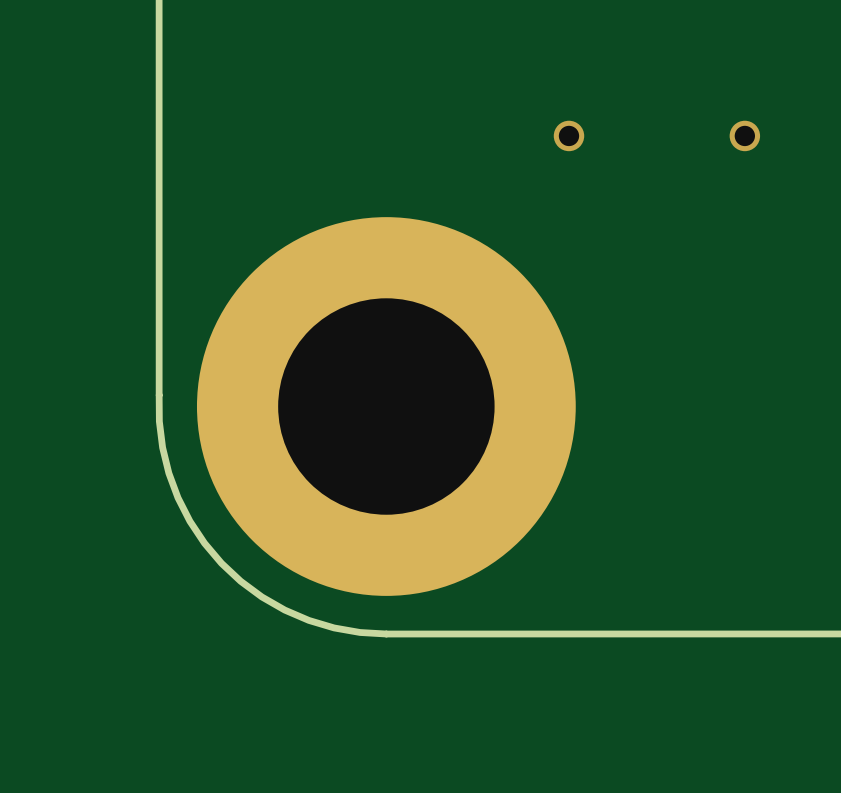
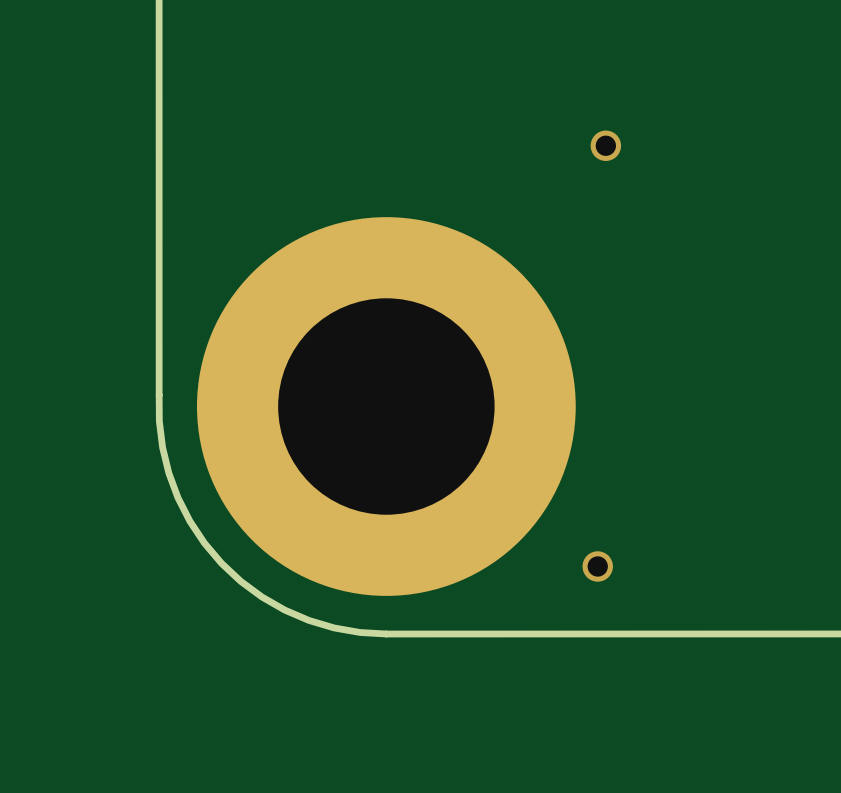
via position: (568, 135) -> (605, 145)
via: (744, 135) -> none
via: none -> (597, 566)

